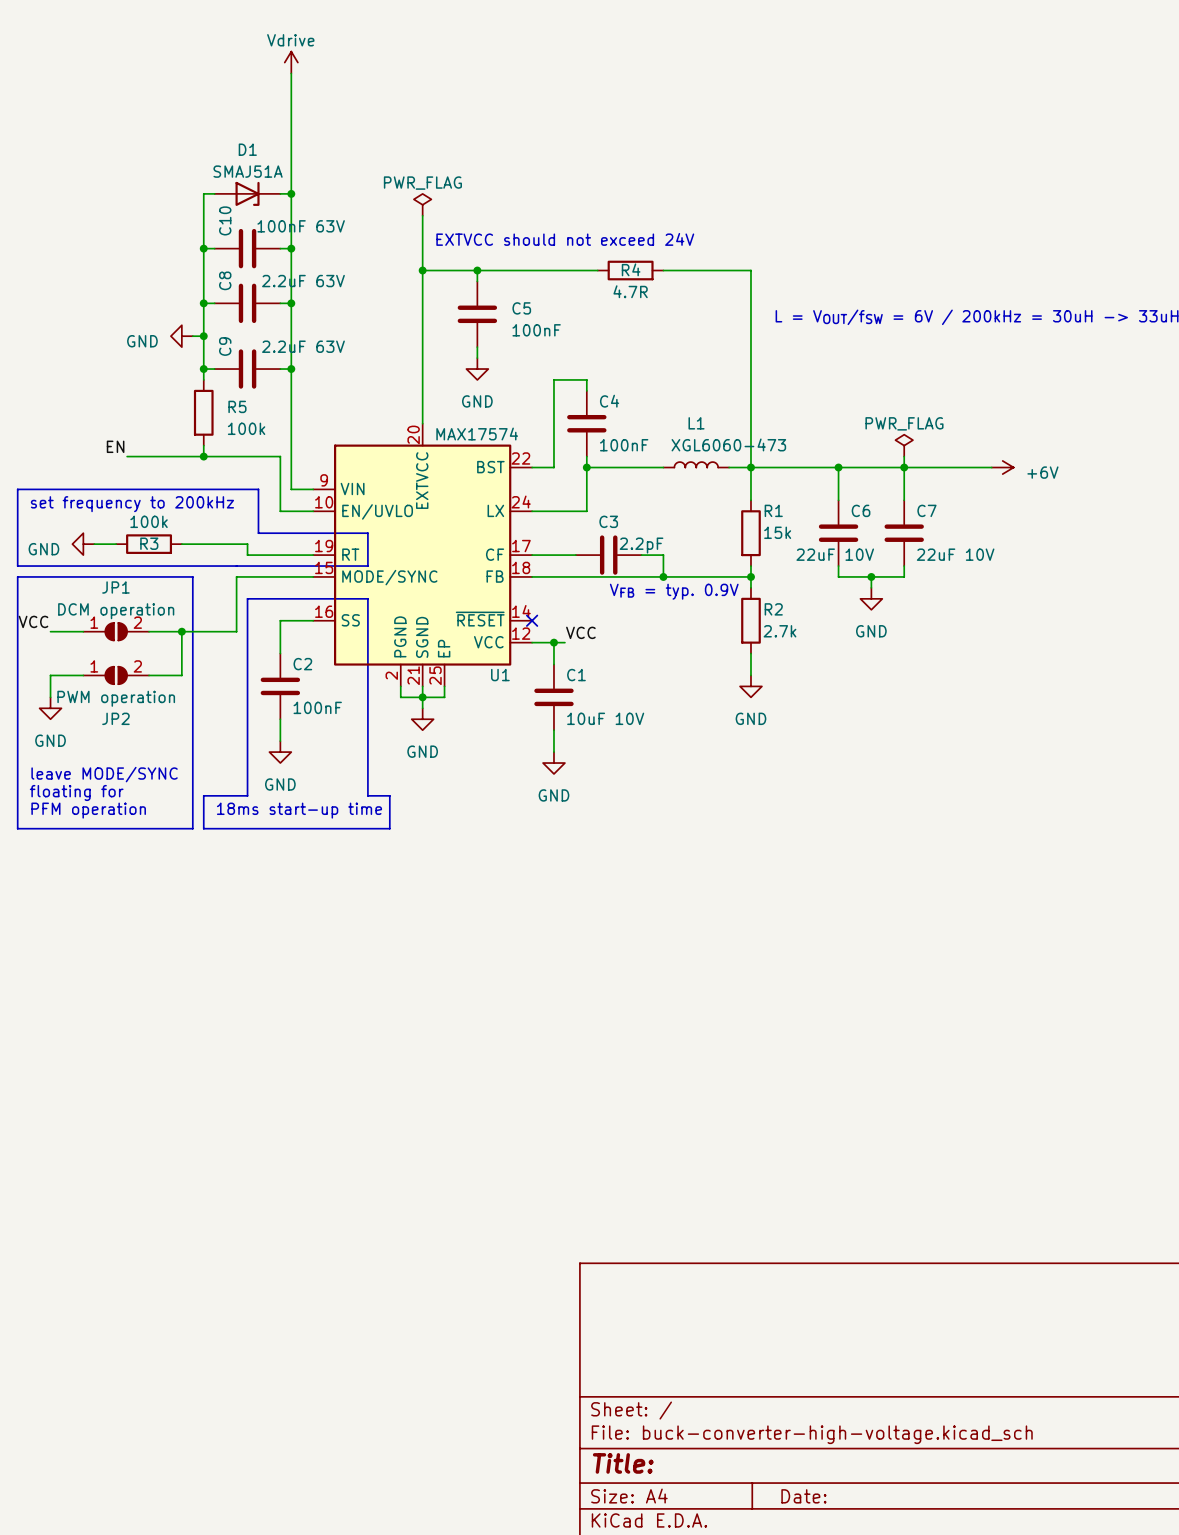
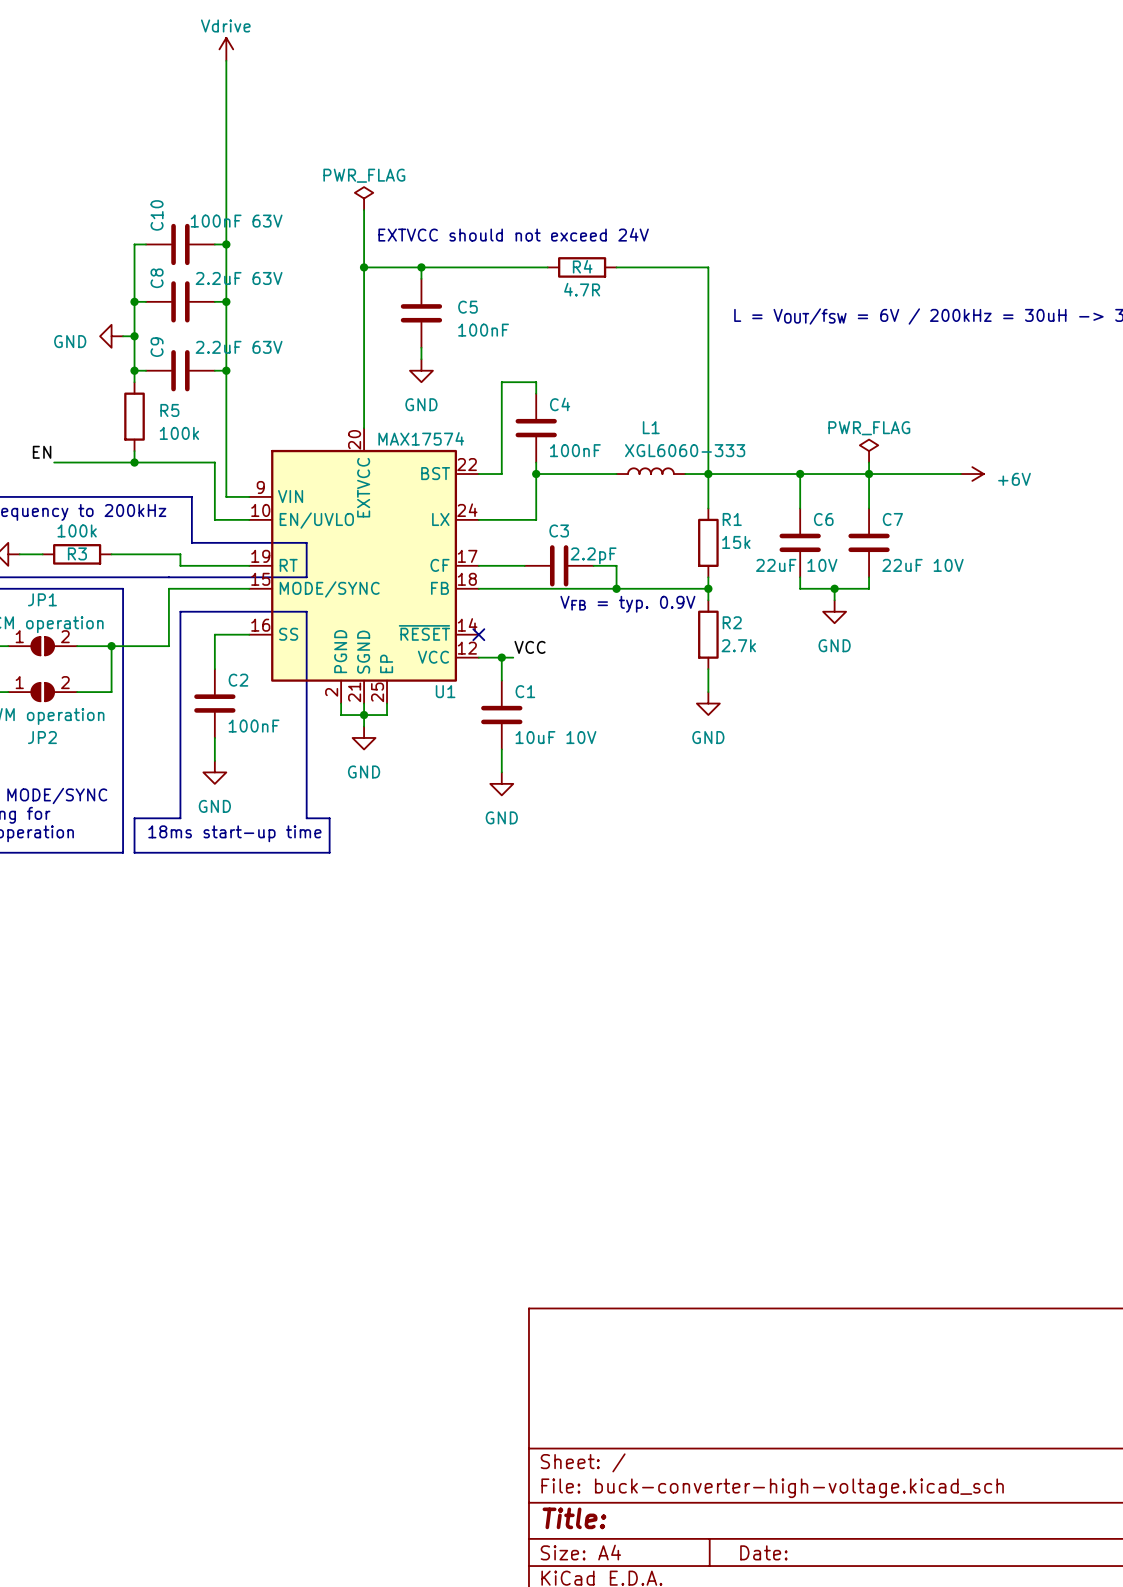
wire: (214, 193) (203, 193) (203, 248) -> none
D1: SMAJ51A (247, 193) -> none
wire: (280, 193) (291, 193) -> none
junction: (291, 193) -> none
junction: (203, 248) -> none
L1 value: XGL6060-473 (728, 444) -> XGL6060-333 (685, 450)

